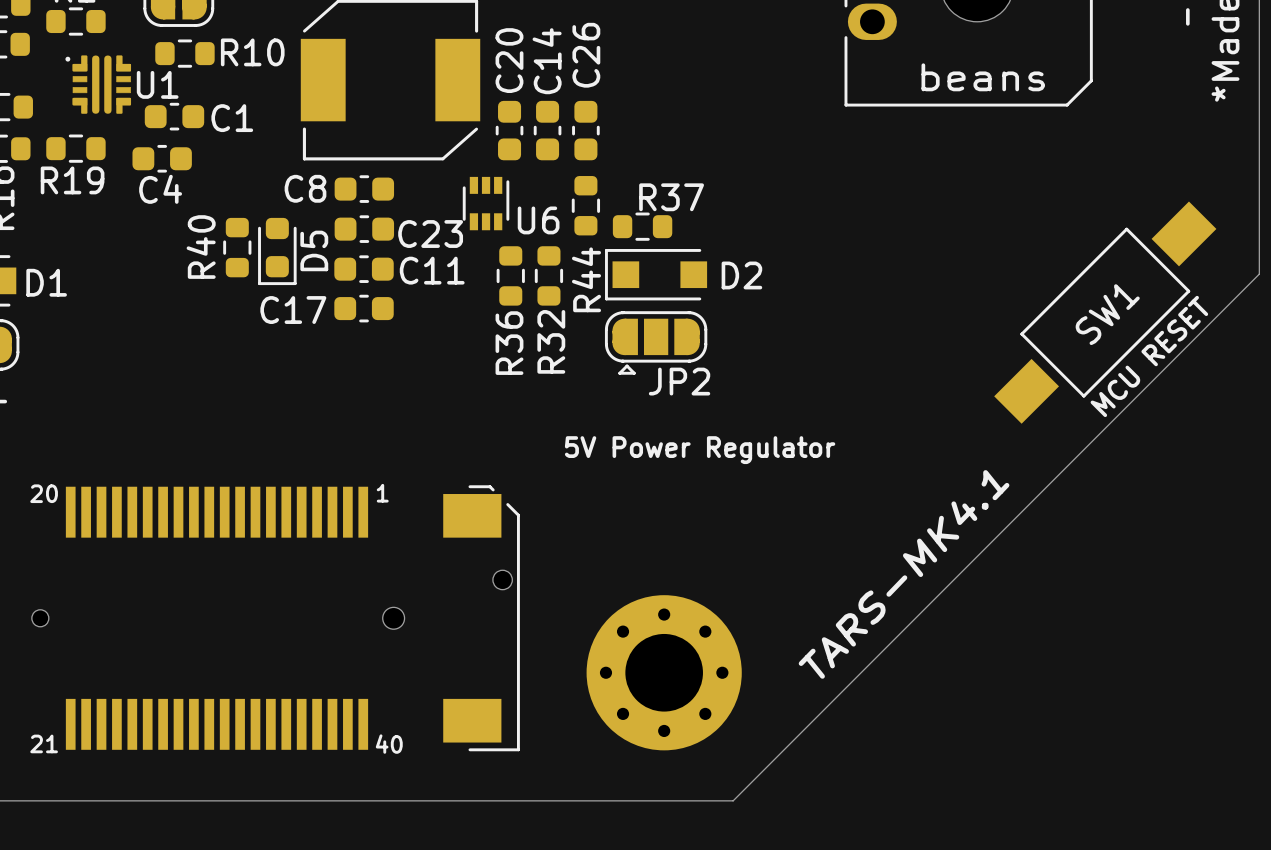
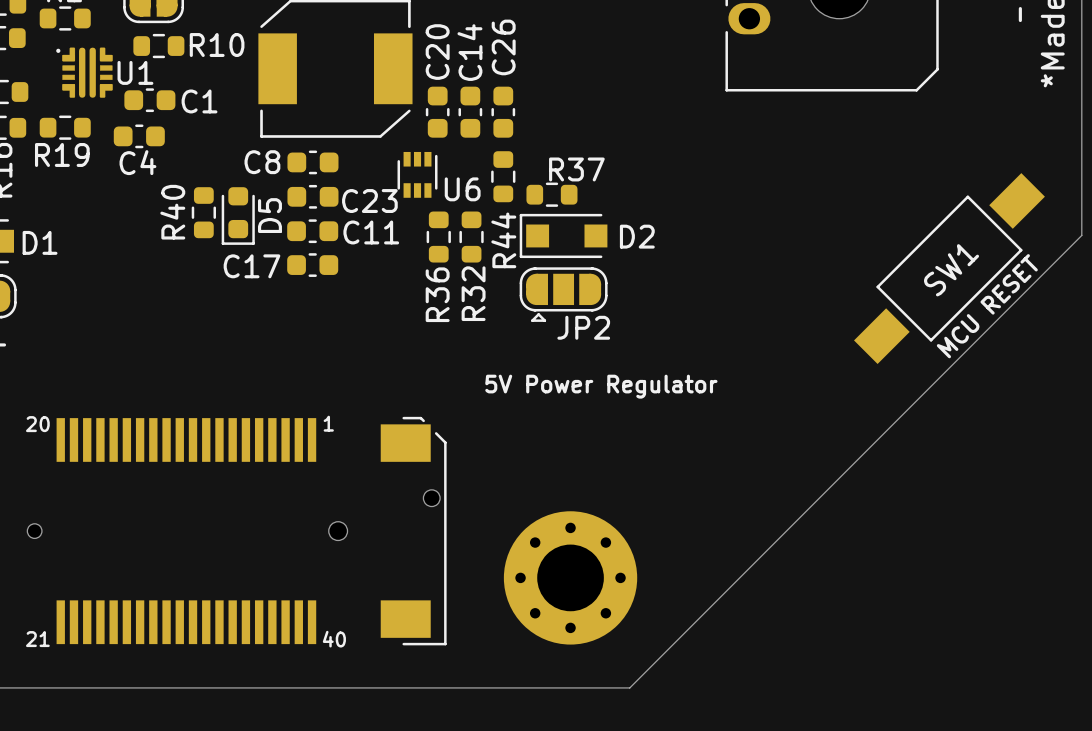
text: beans (983, 77) -> none
text: TARS-MK4.1 (904, 574) -> none

